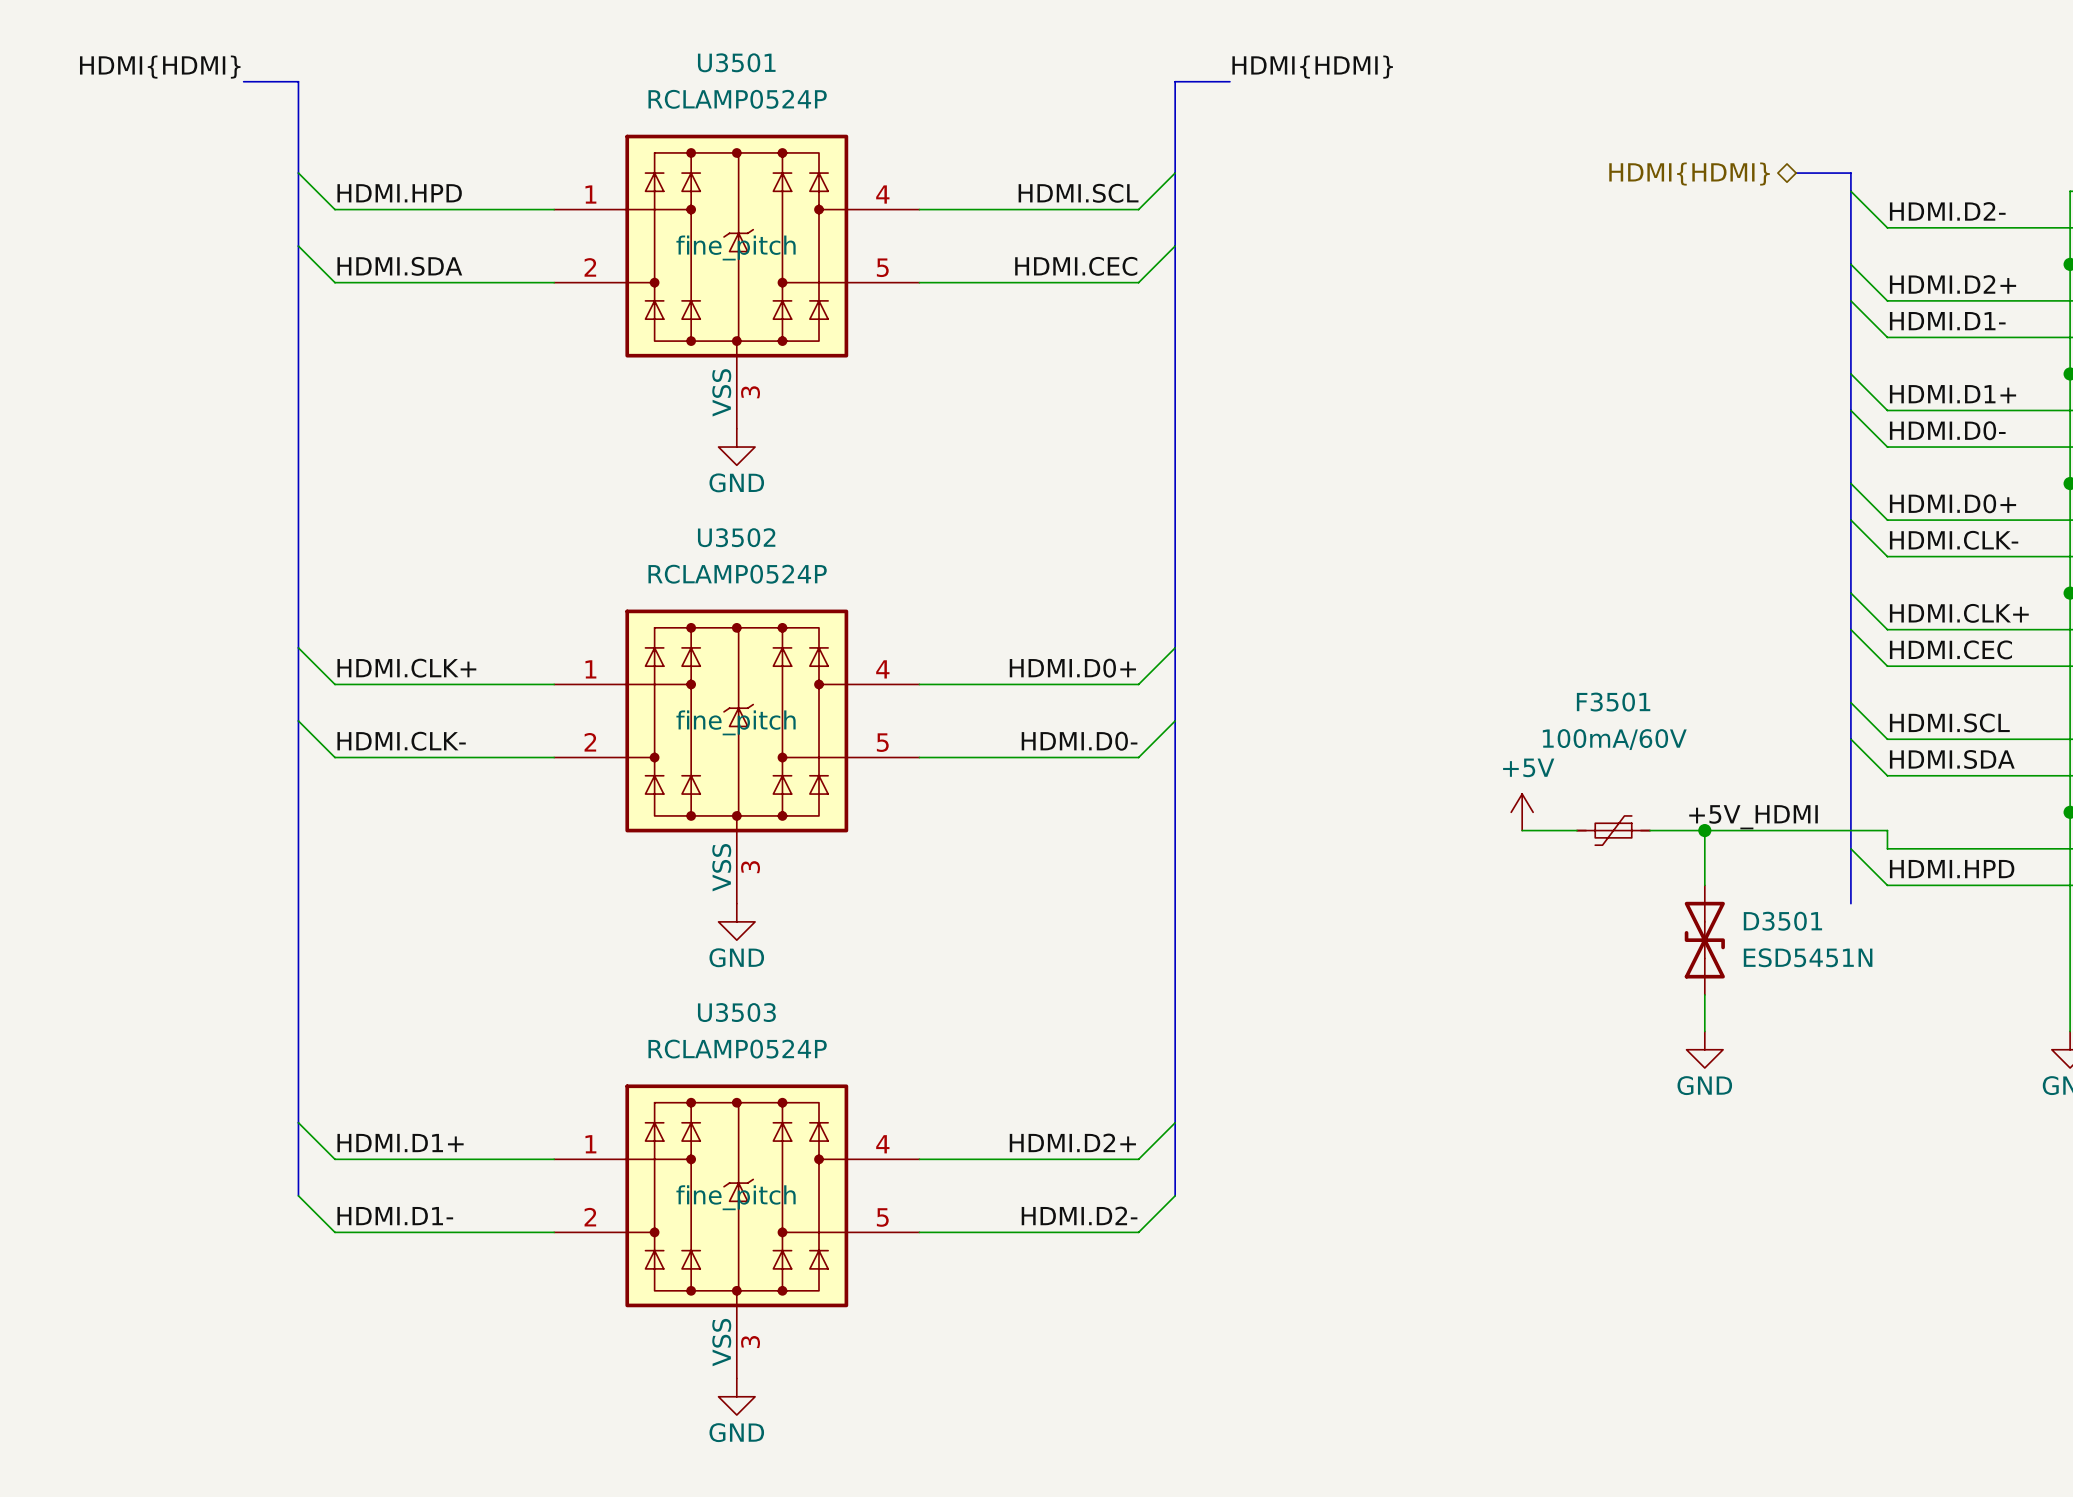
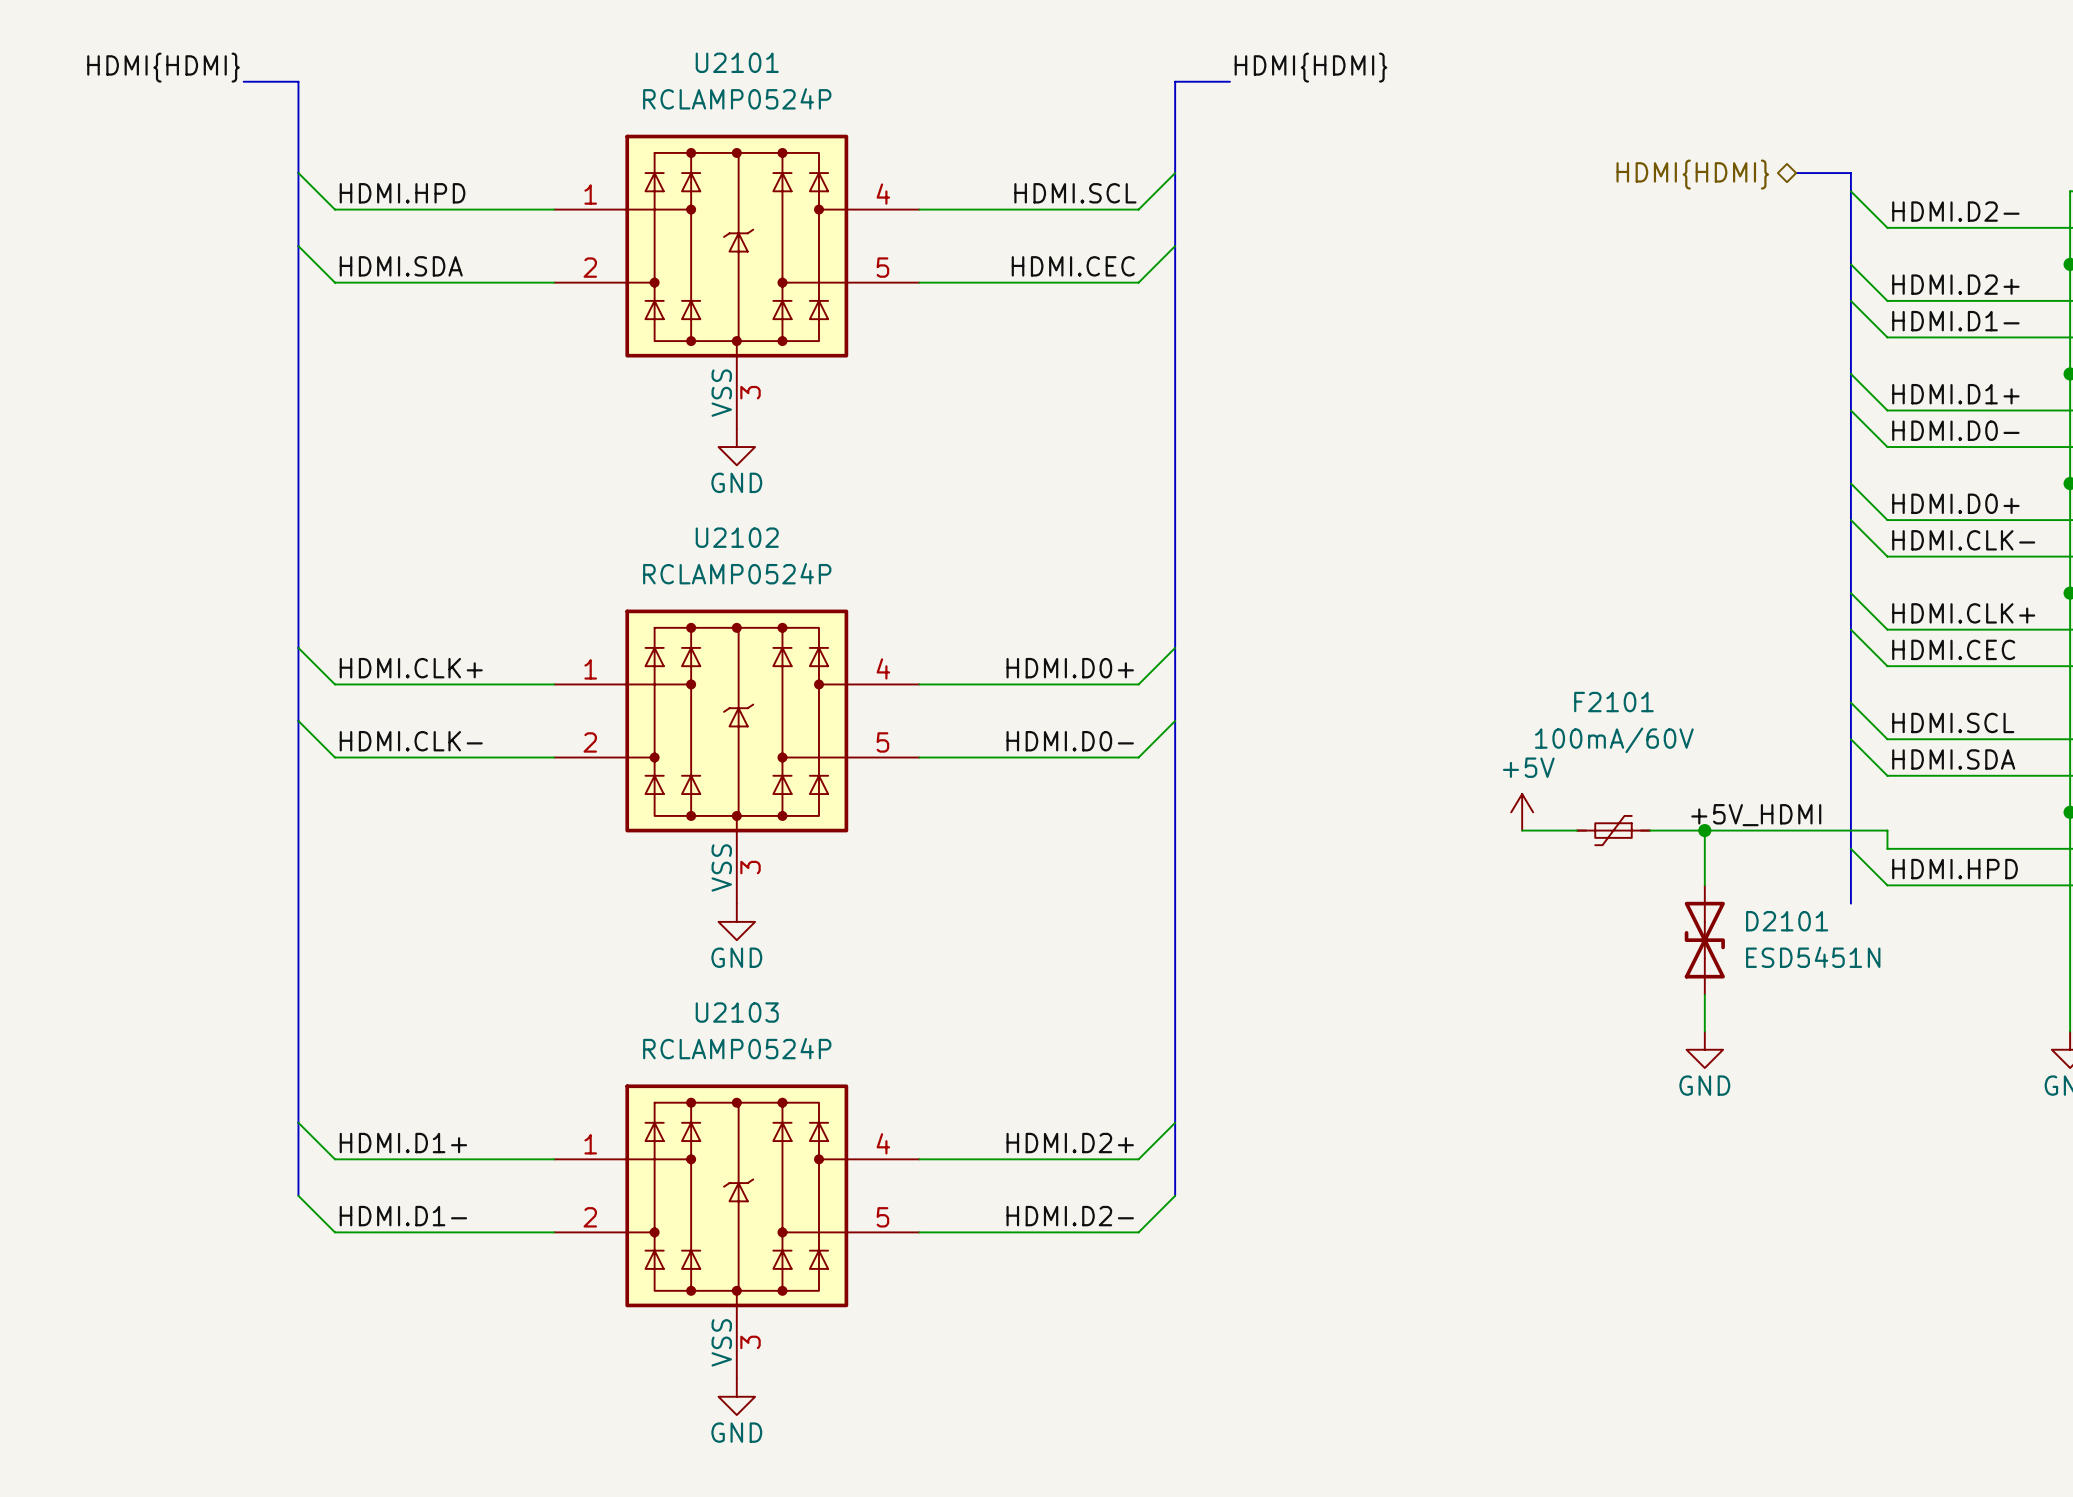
U3501 name: U3501 (736, 62) -> U2101 (737, 62)
U3501 text: fine_pitch (736, 247) -> none
U3502 name: U3502 (736, 537) -> U2102 (737, 537)
F3501 name: F3501 (1613, 702) -> F2101 (1613, 702)
U3502 text: fine_pitch (736, 722) -> none
D3501 name: D3501 (1782, 921) -> D2101 (1787, 921)
U3503 name: U3503 (736, 1012) -> U2103 (737, 1012)
U3503 text: fine_pitch (736, 1197) -> none

